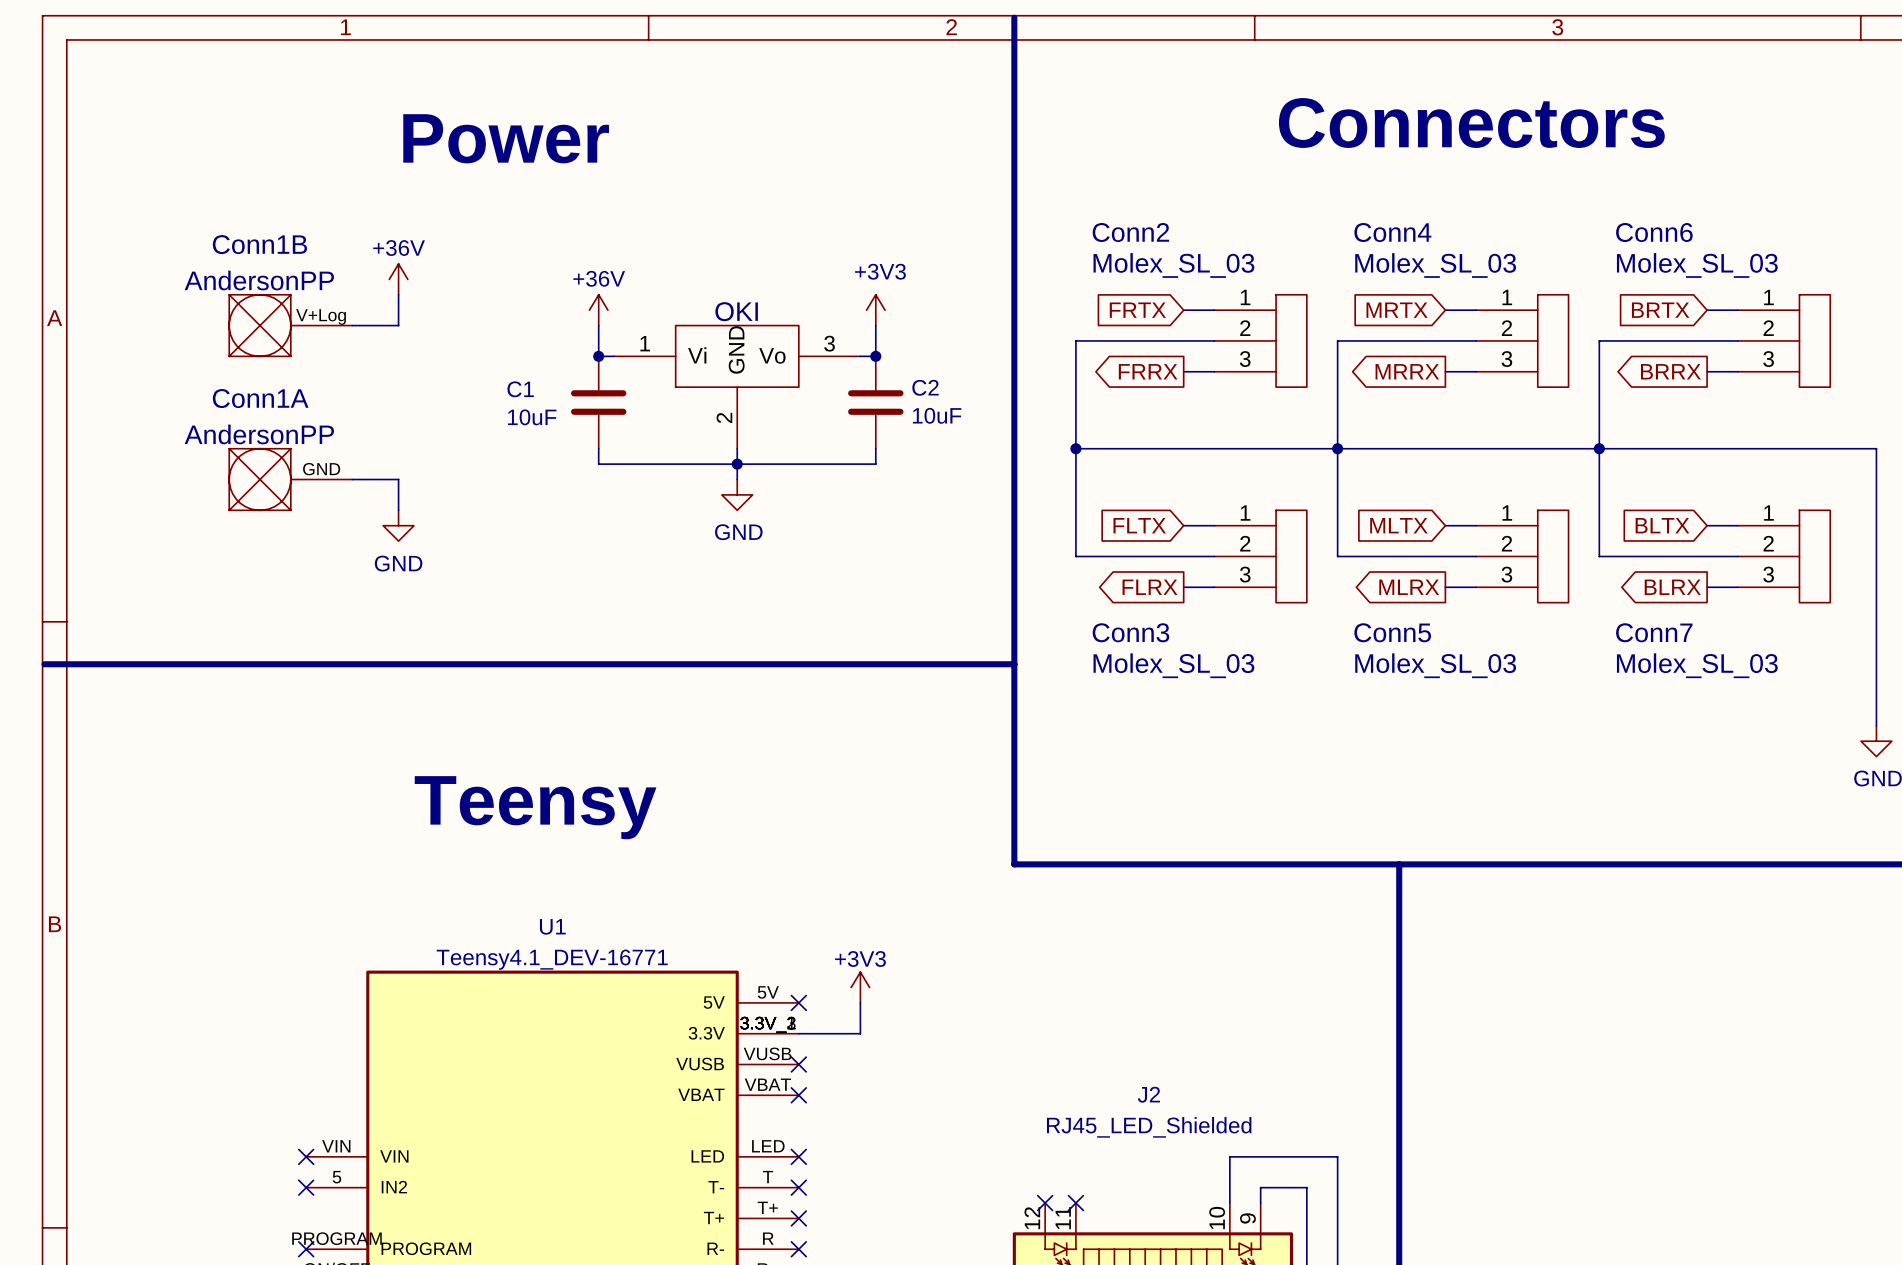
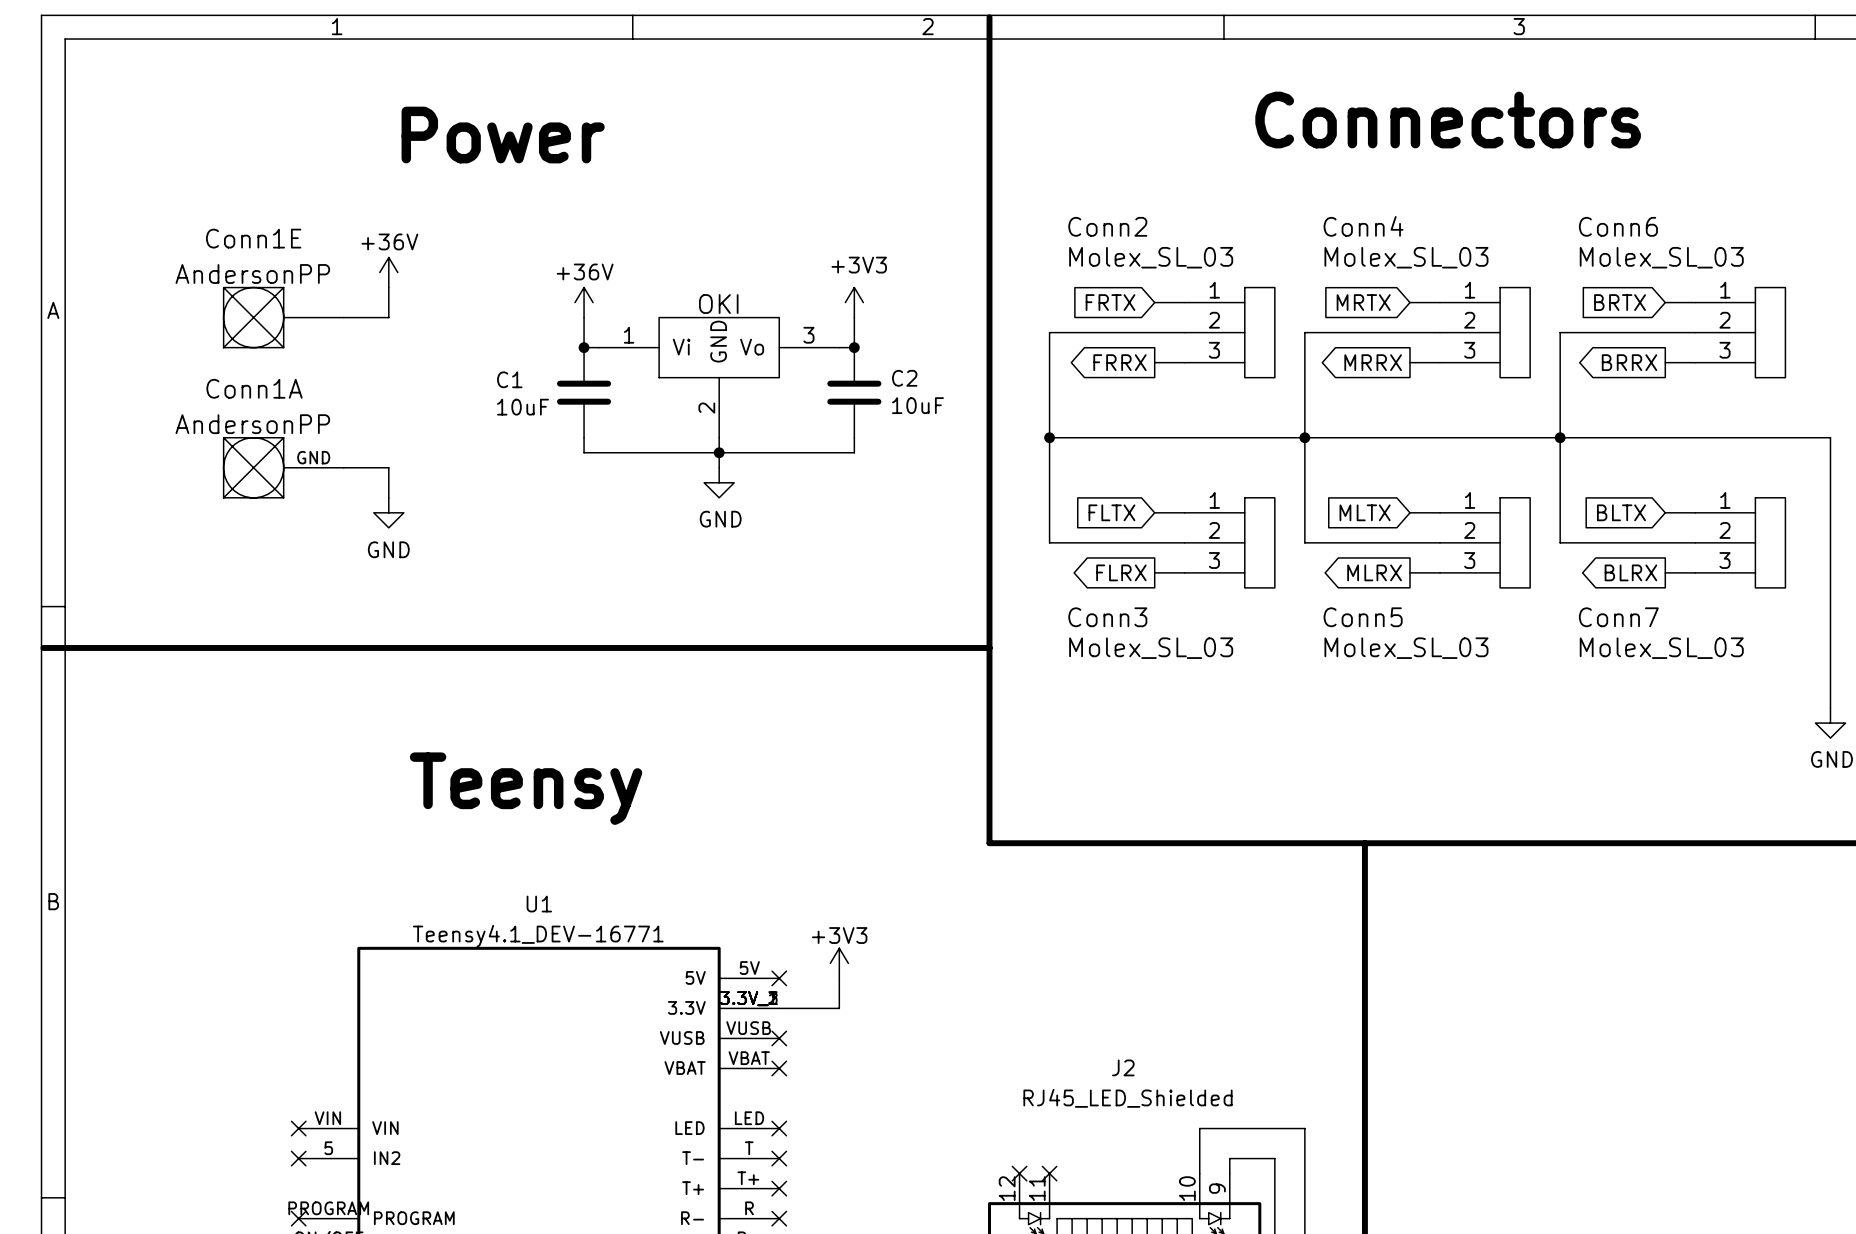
Conn1B name: Conn1B (259, 244) -> Conn1E (253, 238)
Conn1B pin name: V+Log (321, 317) -> none

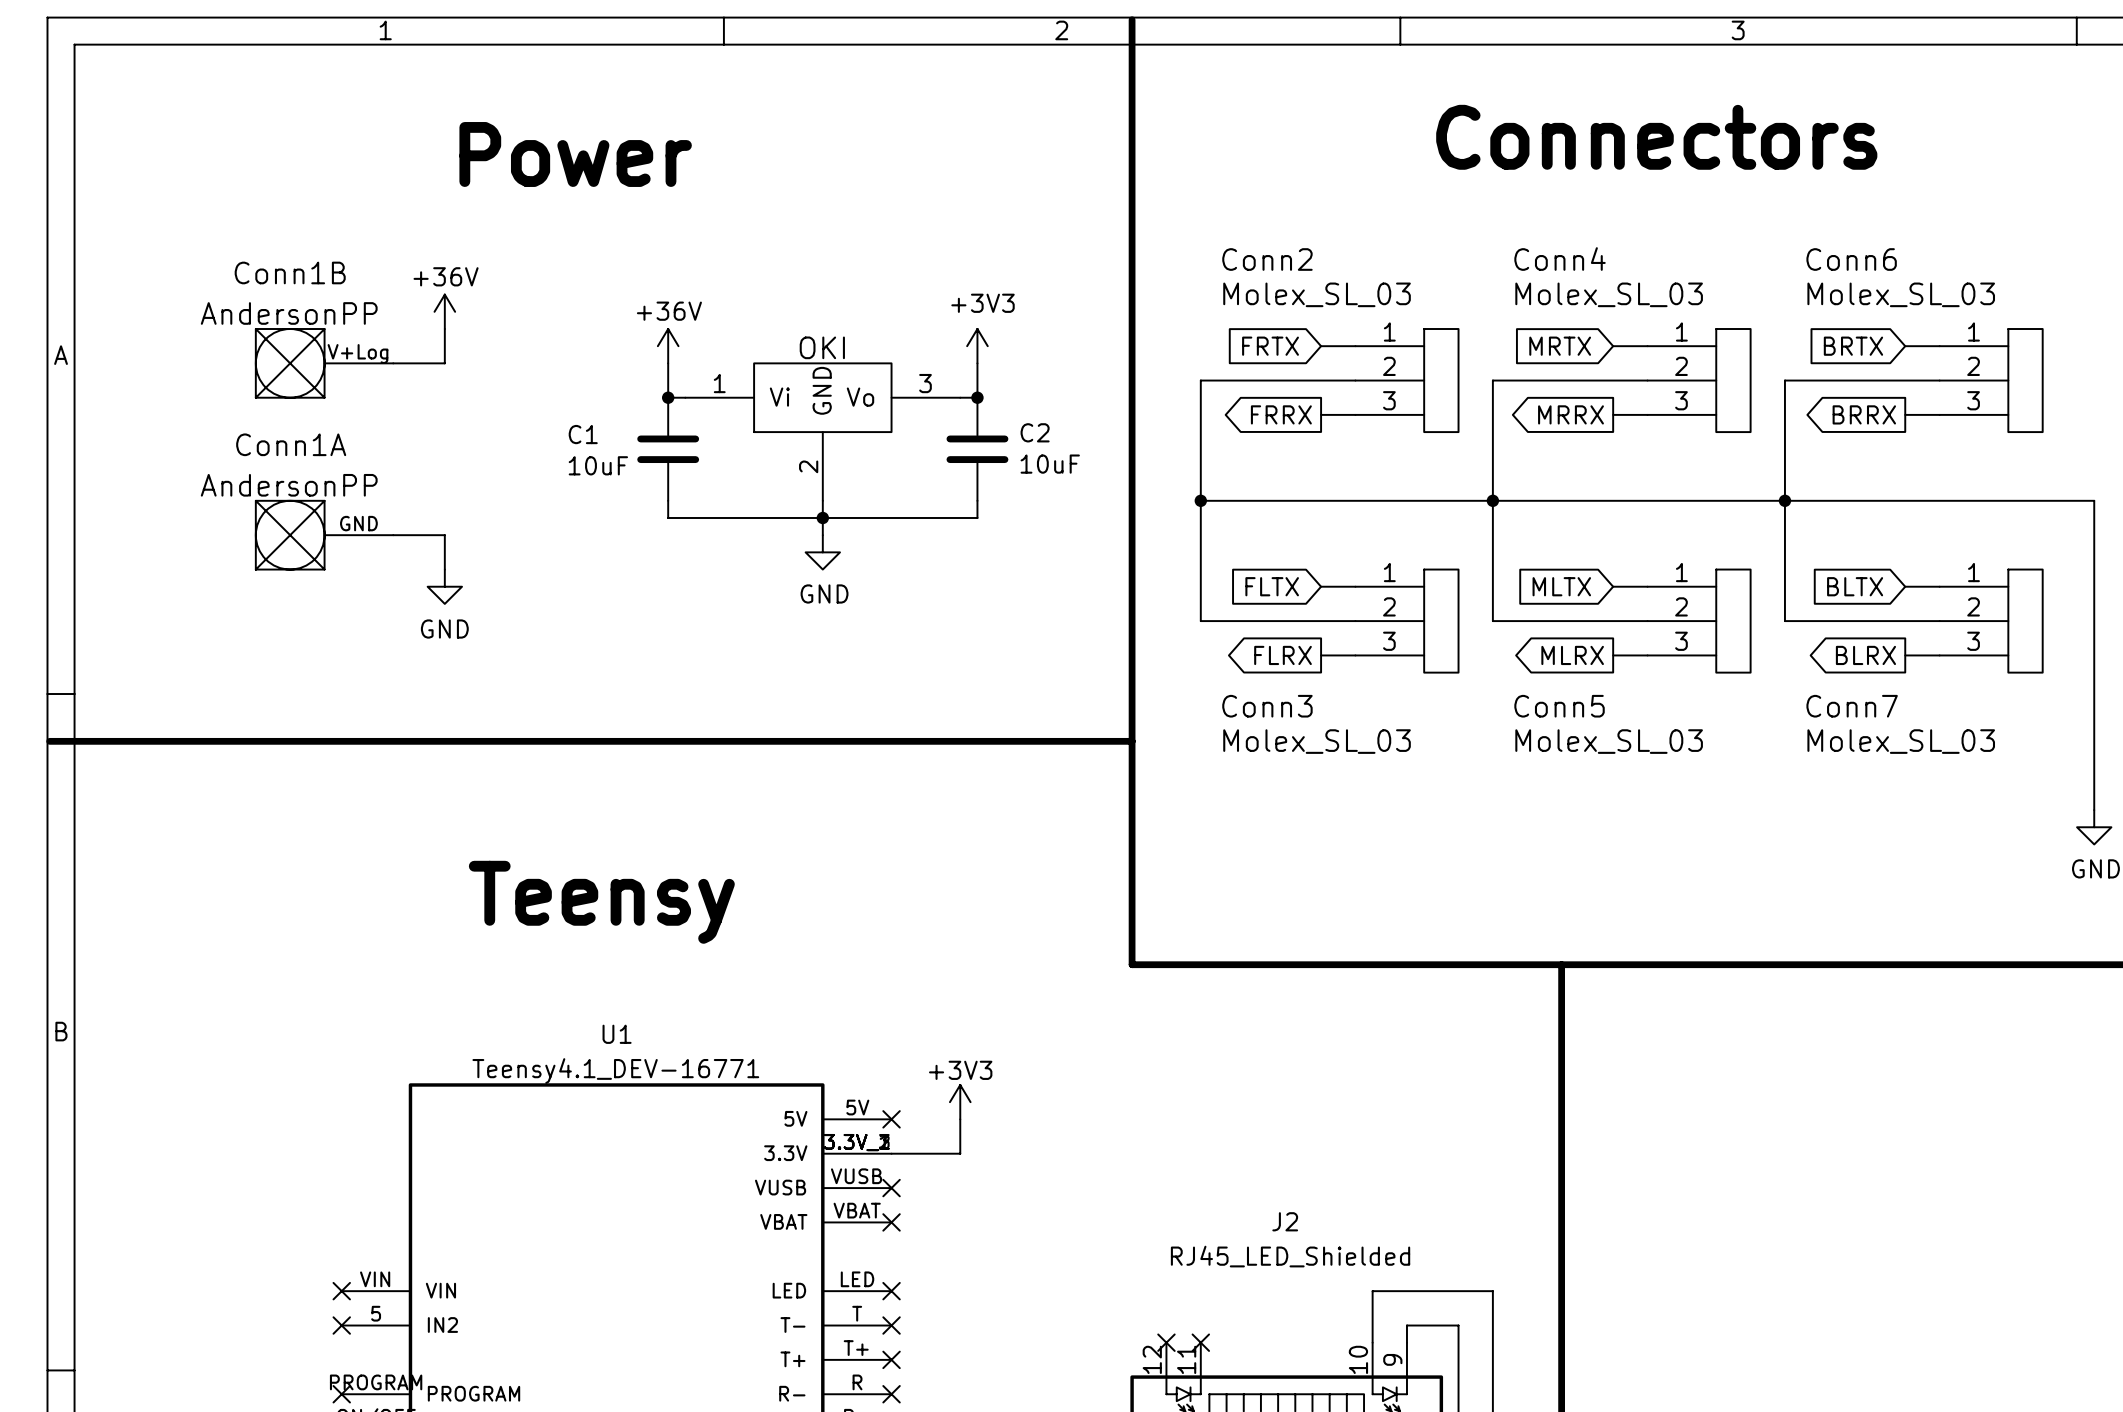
Conn1E name: Conn1E (253, 238) -> Conn1B (290, 272)
Conn1E pin name: none -> V+Log (357, 354)

